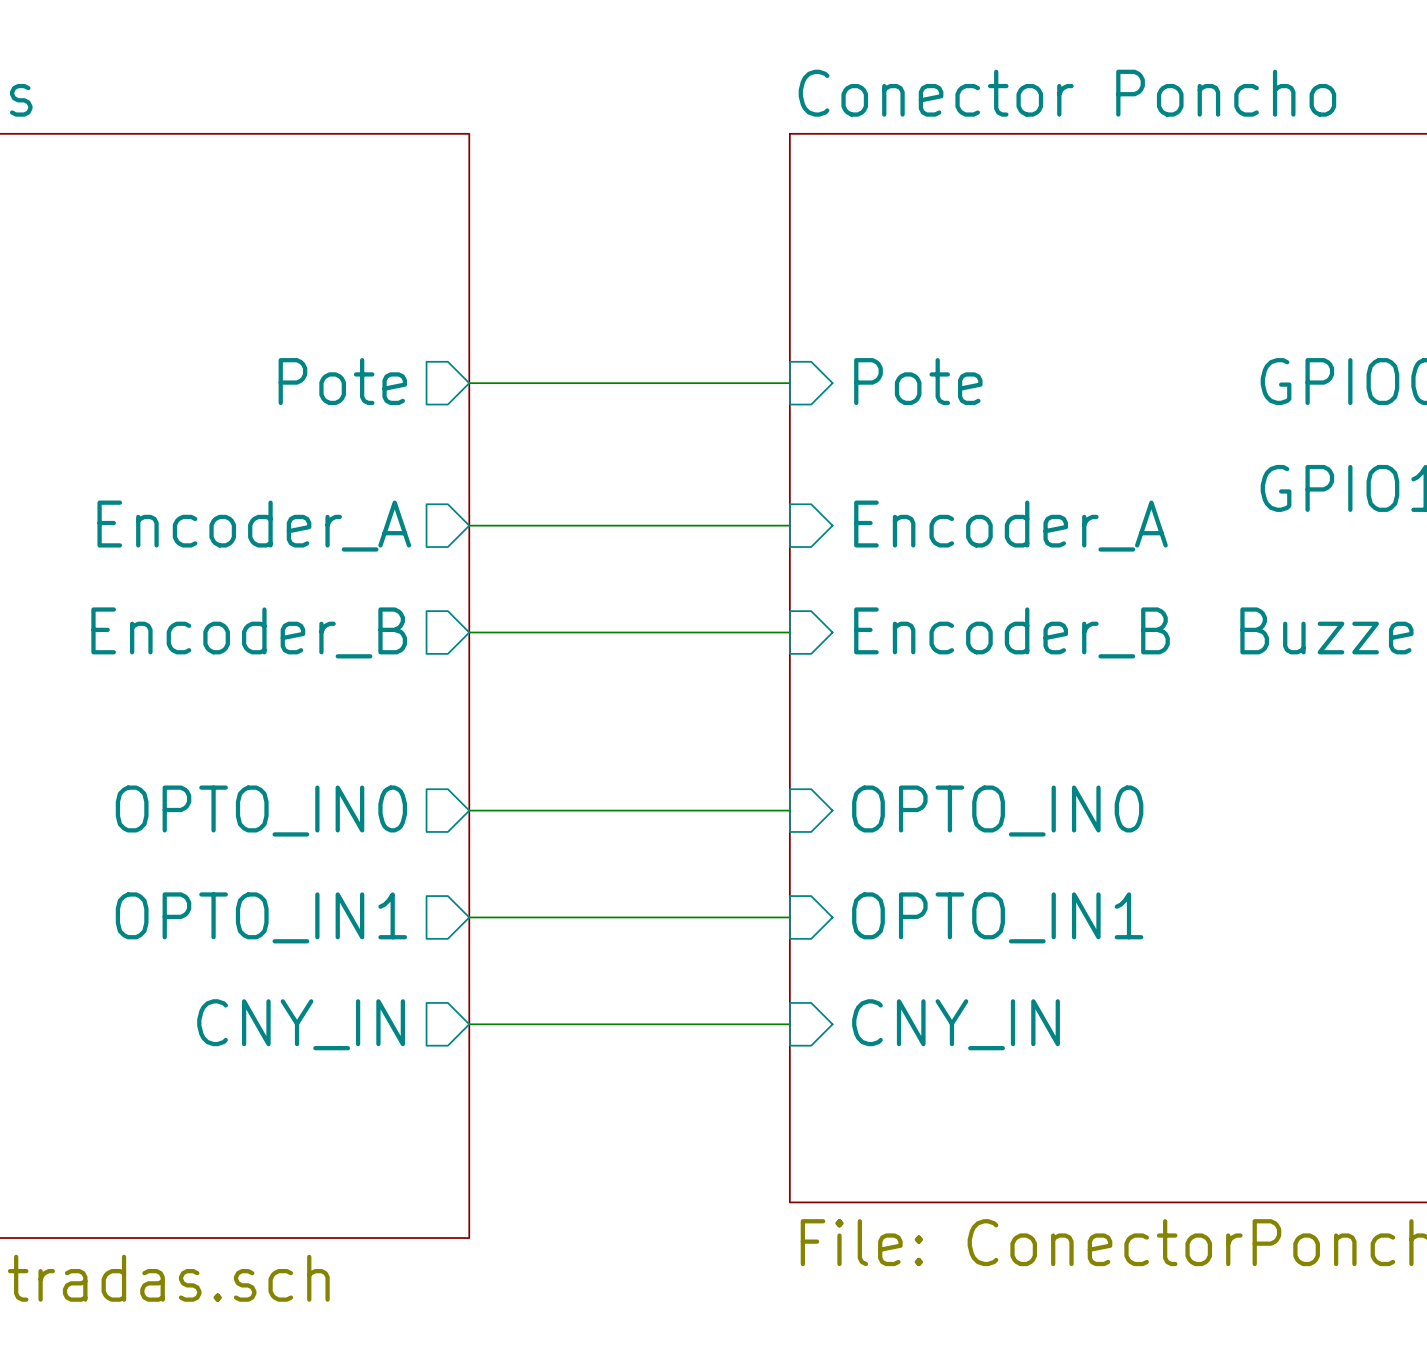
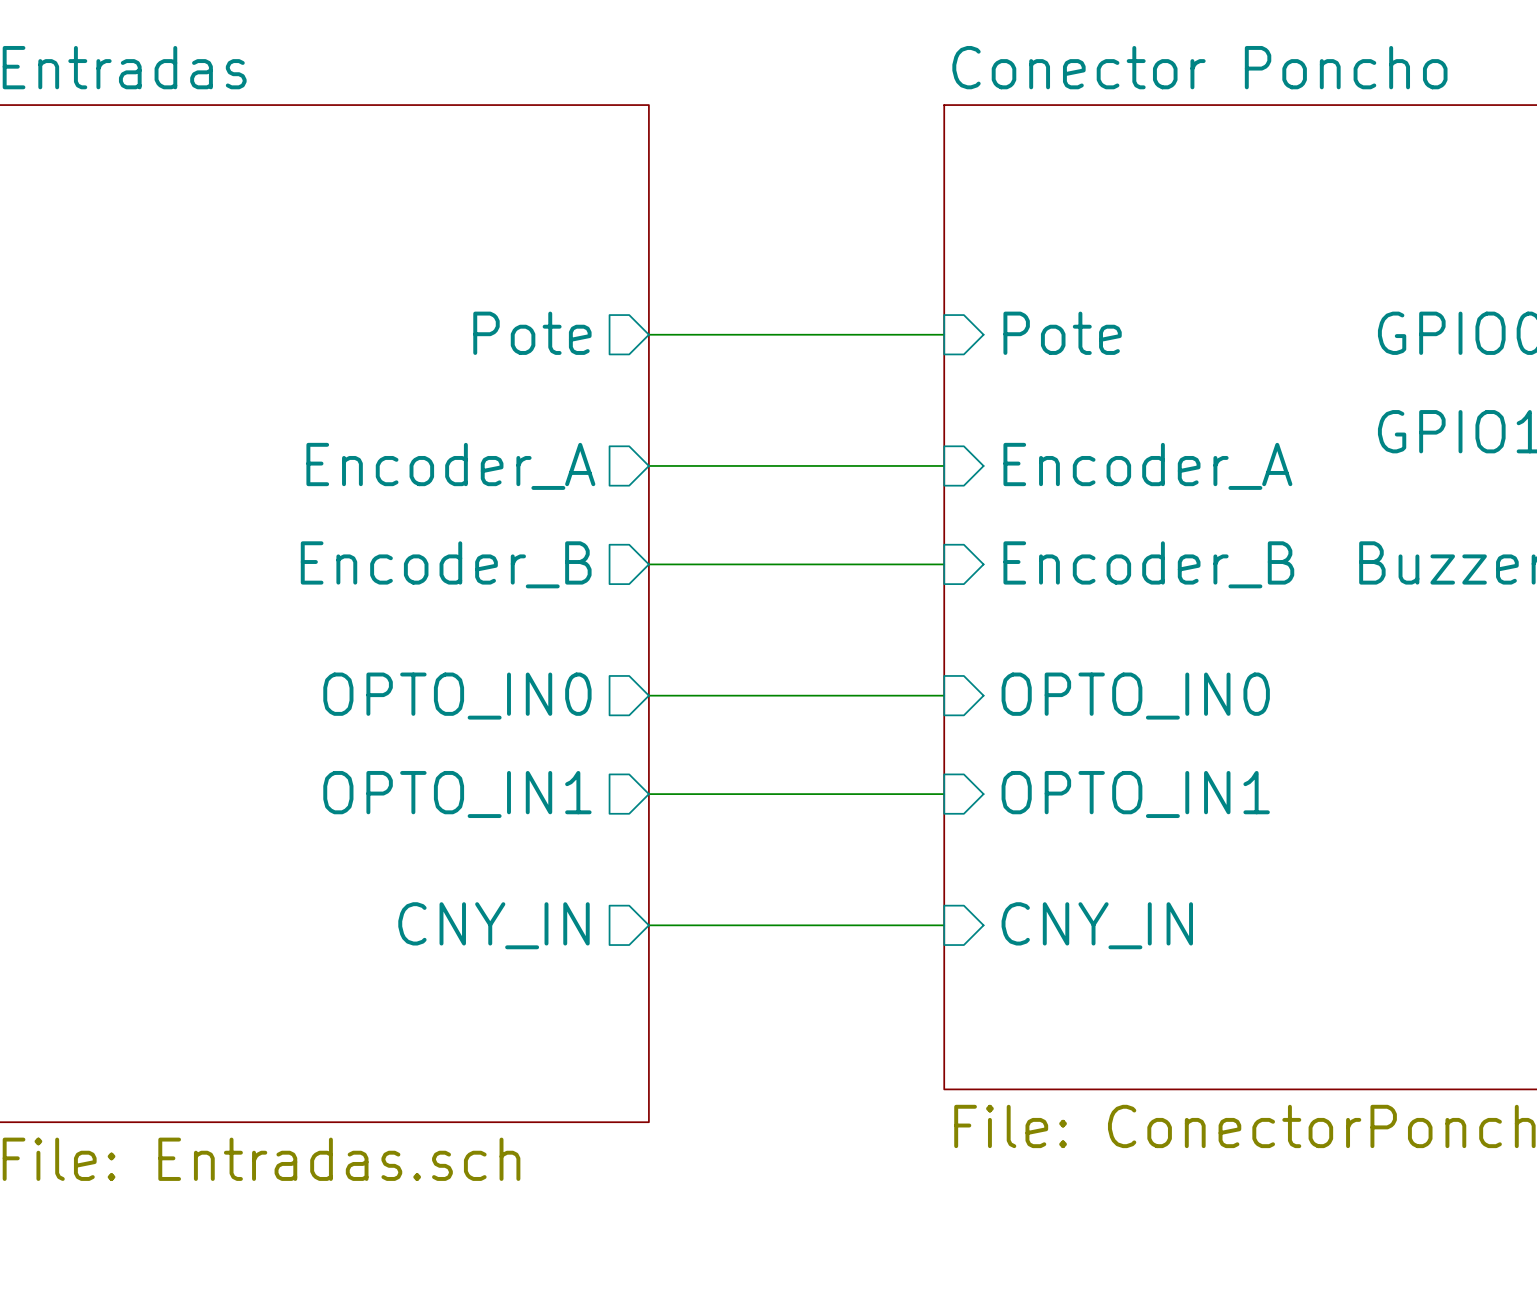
wire: (469, 810) (789, 810) -> (648, 695) (944, 695)
sheet pin position: OPTO_IN0 (261, 811) -> OPTO_IN0 (457, 696)
sheet pin position: OPTO_IN0 (997, 811) -> OPTO_IN0 (1135, 696)
sheet pin position: OPTO_IN1 (261, 917) -> OPTO_IN1 (457, 794)
wire: (469, 917) (789, 917) -> (648, 794) (944, 794)
sheet pin position: OPTO_IN1 (997, 917) -> OPTO_IN1 (1135, 794)

